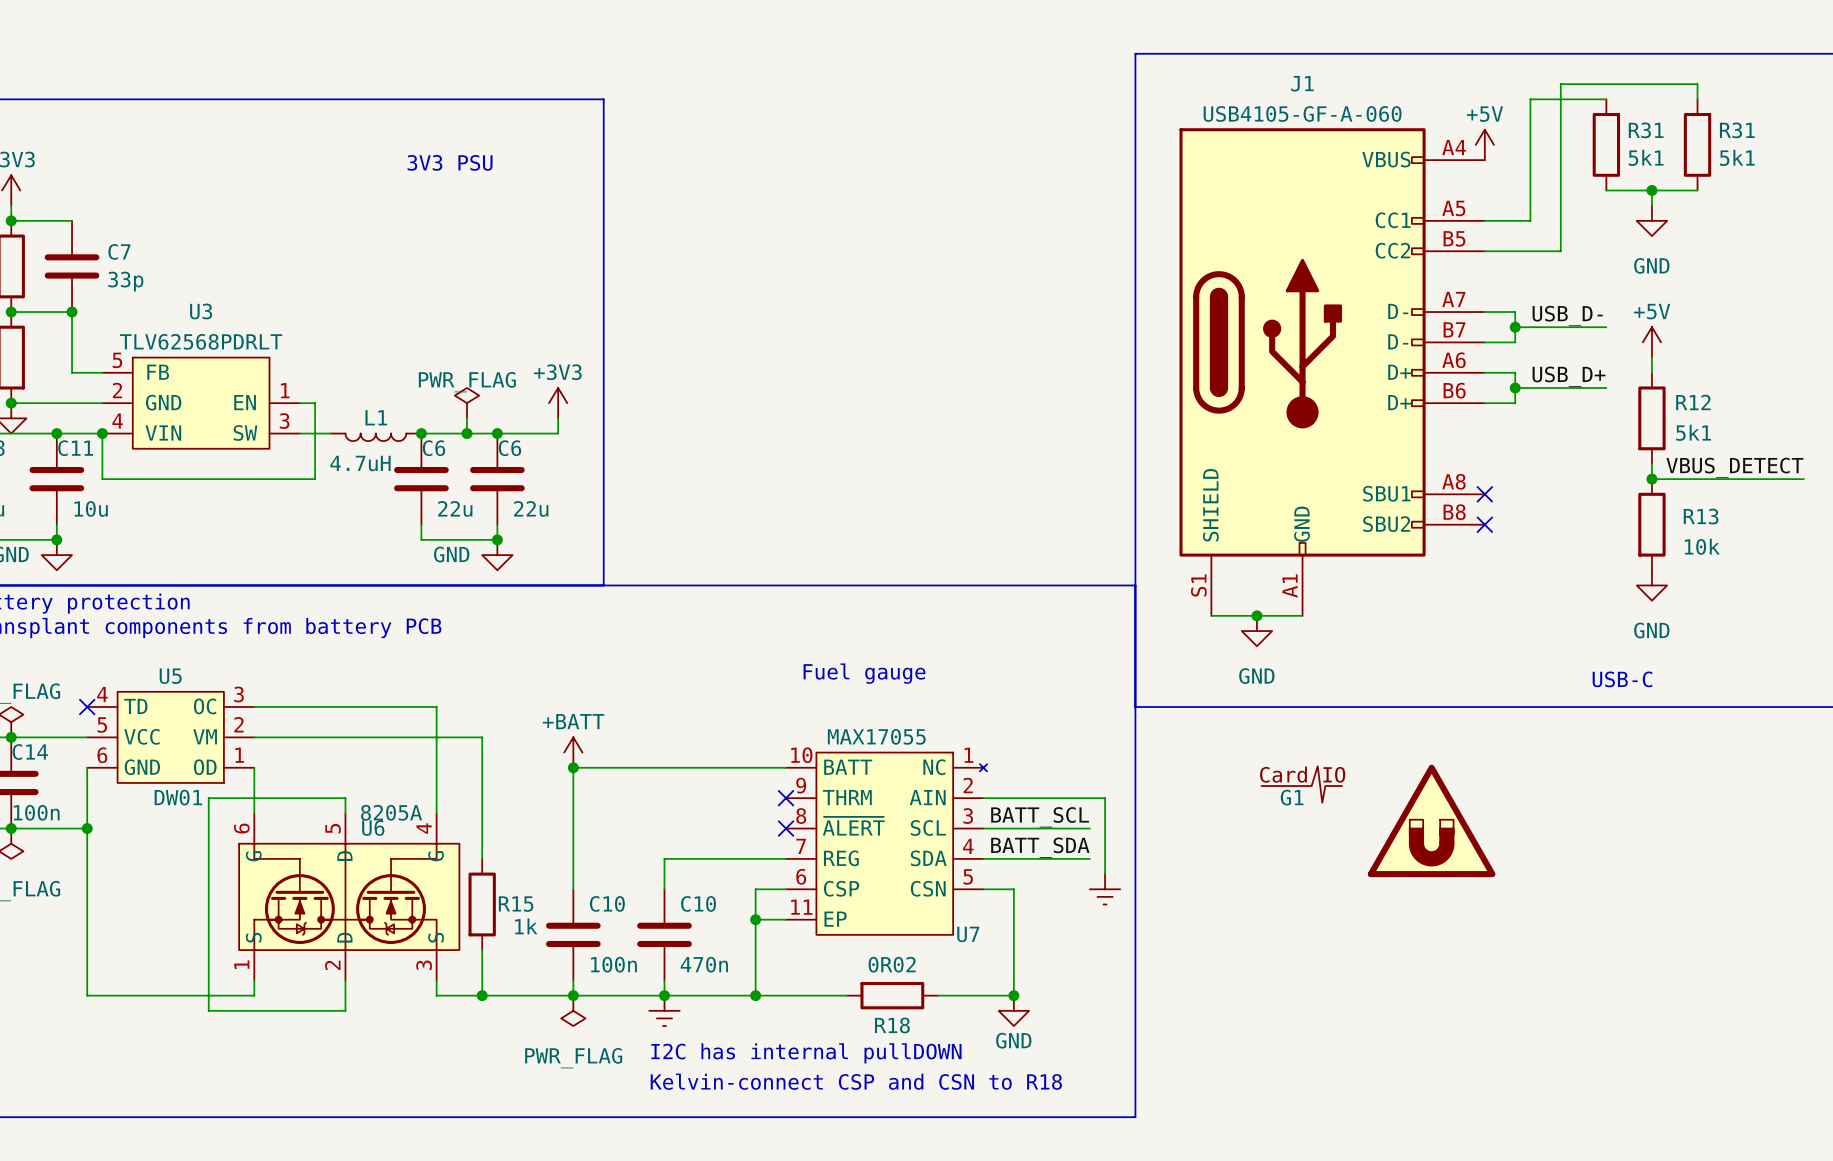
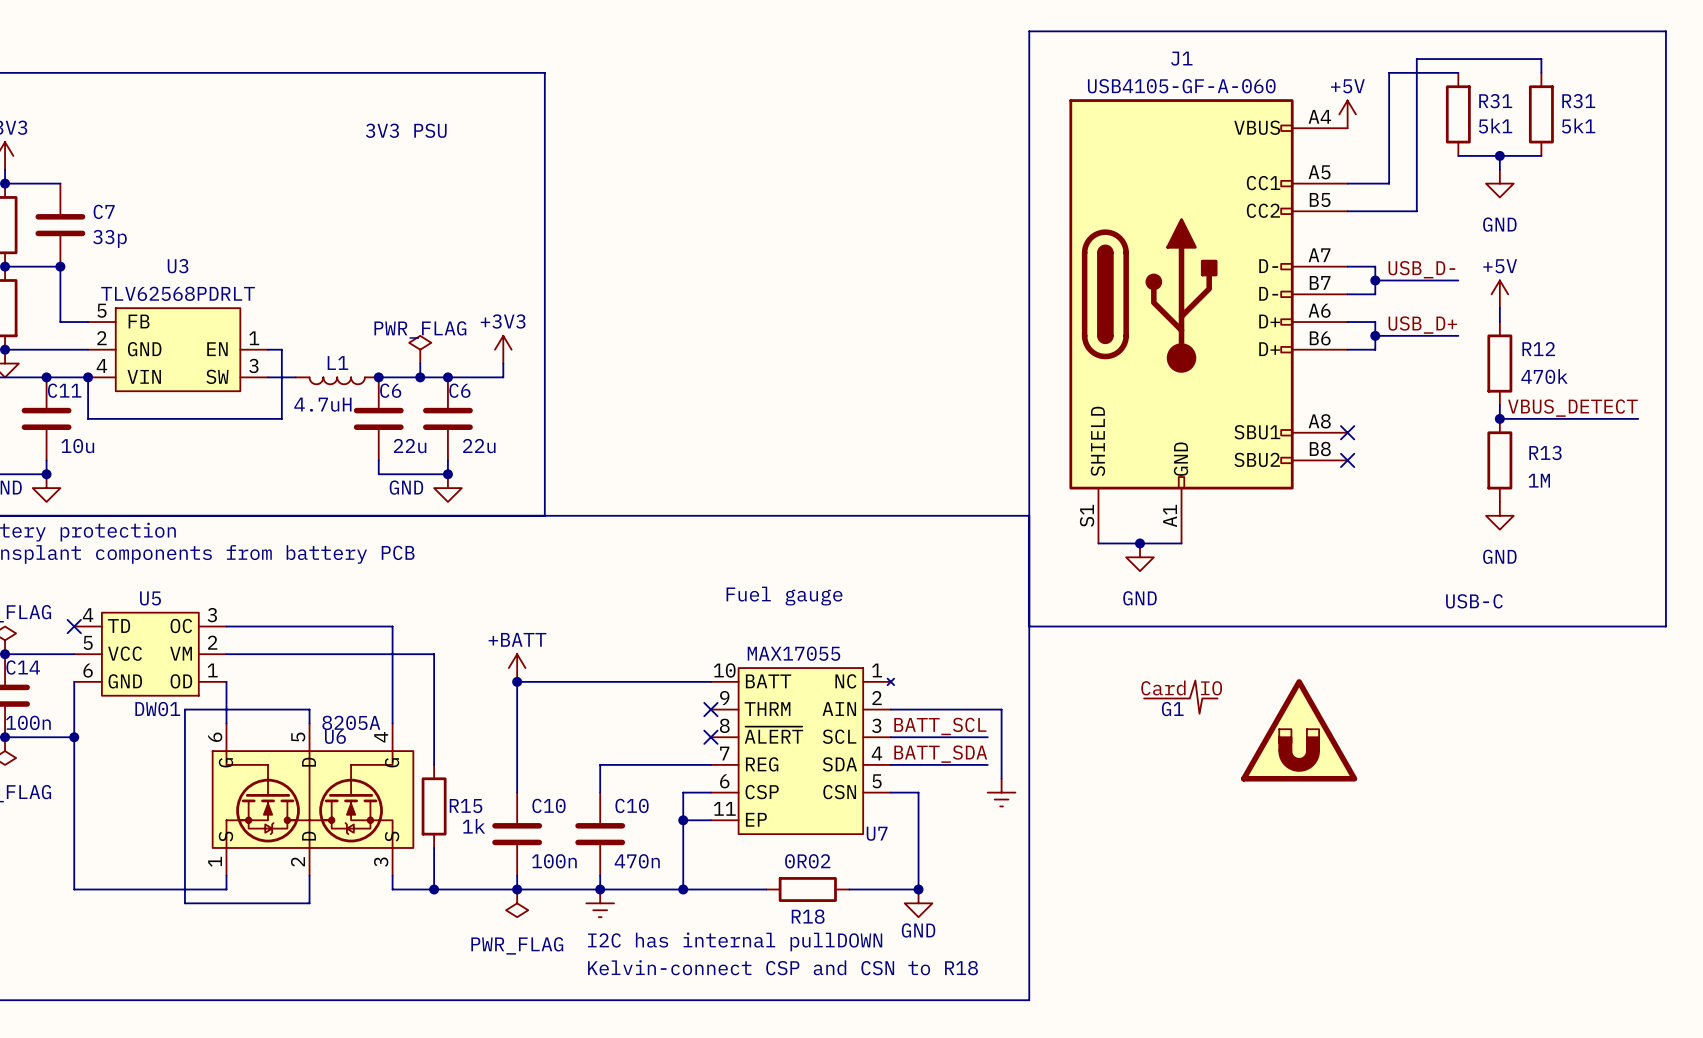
R12 value: 5k1 (1693, 432) -> 470k (1544, 376)
R13 value: 10k (1702, 546) -> 1M (1539, 480)

